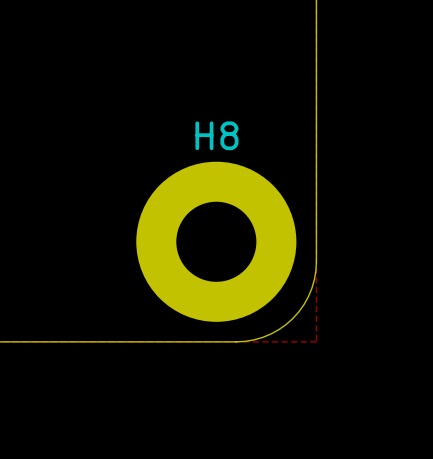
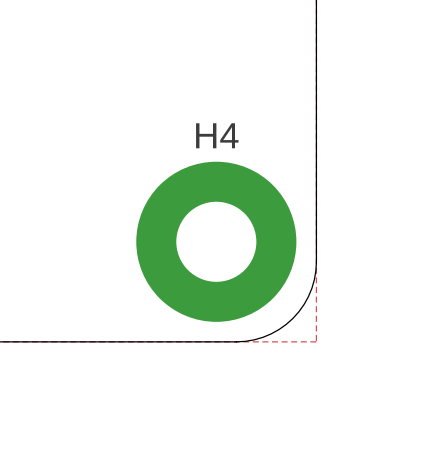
H8 name: H8 (216, 135) -> H4 (217, 135)

